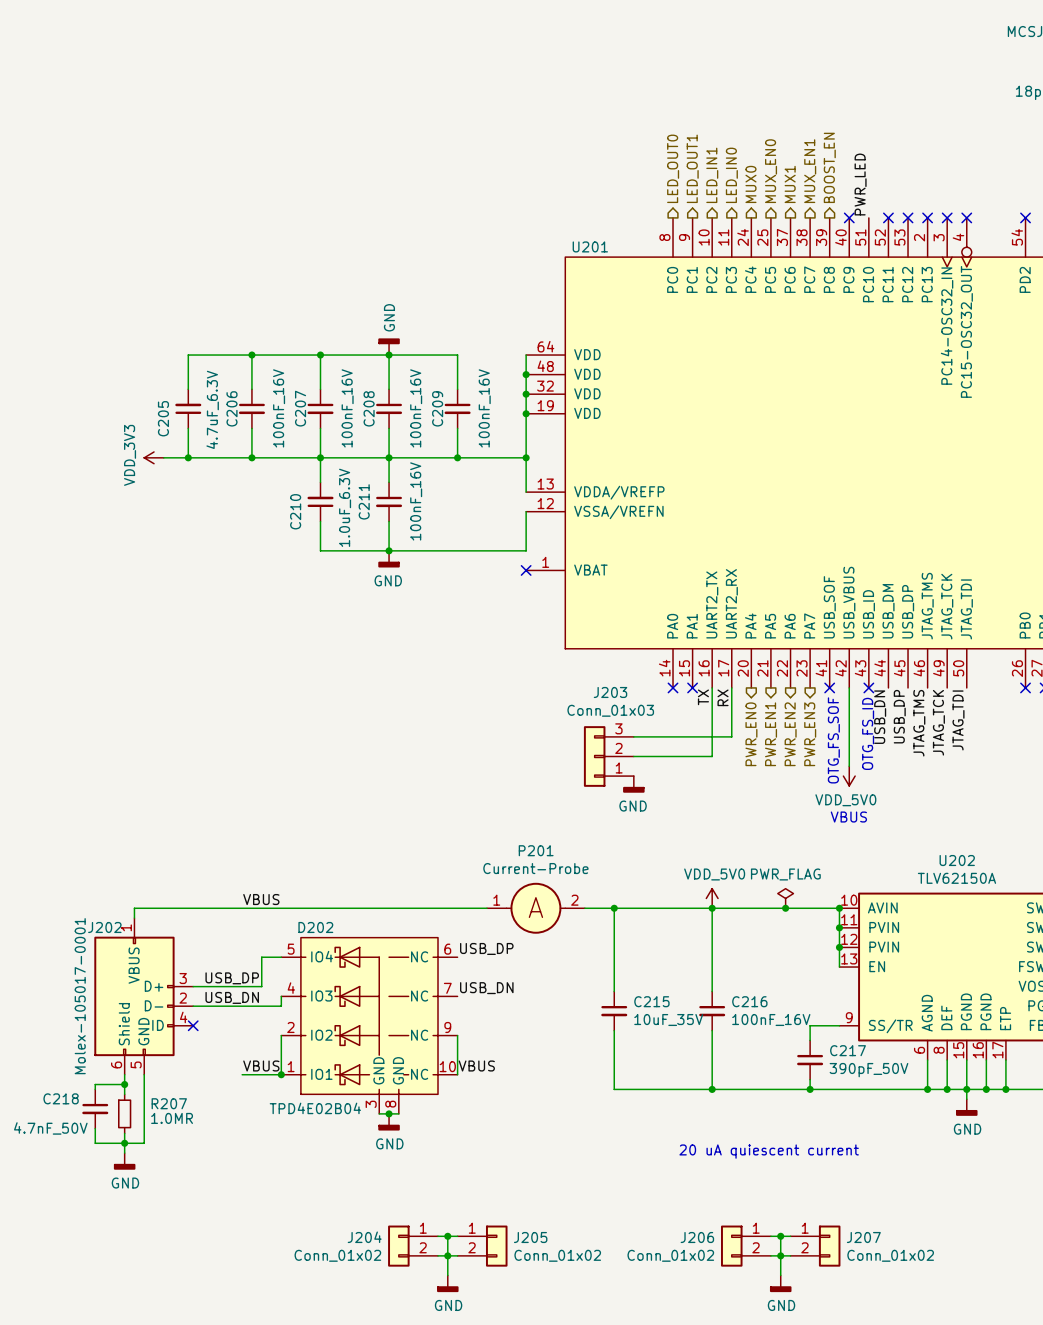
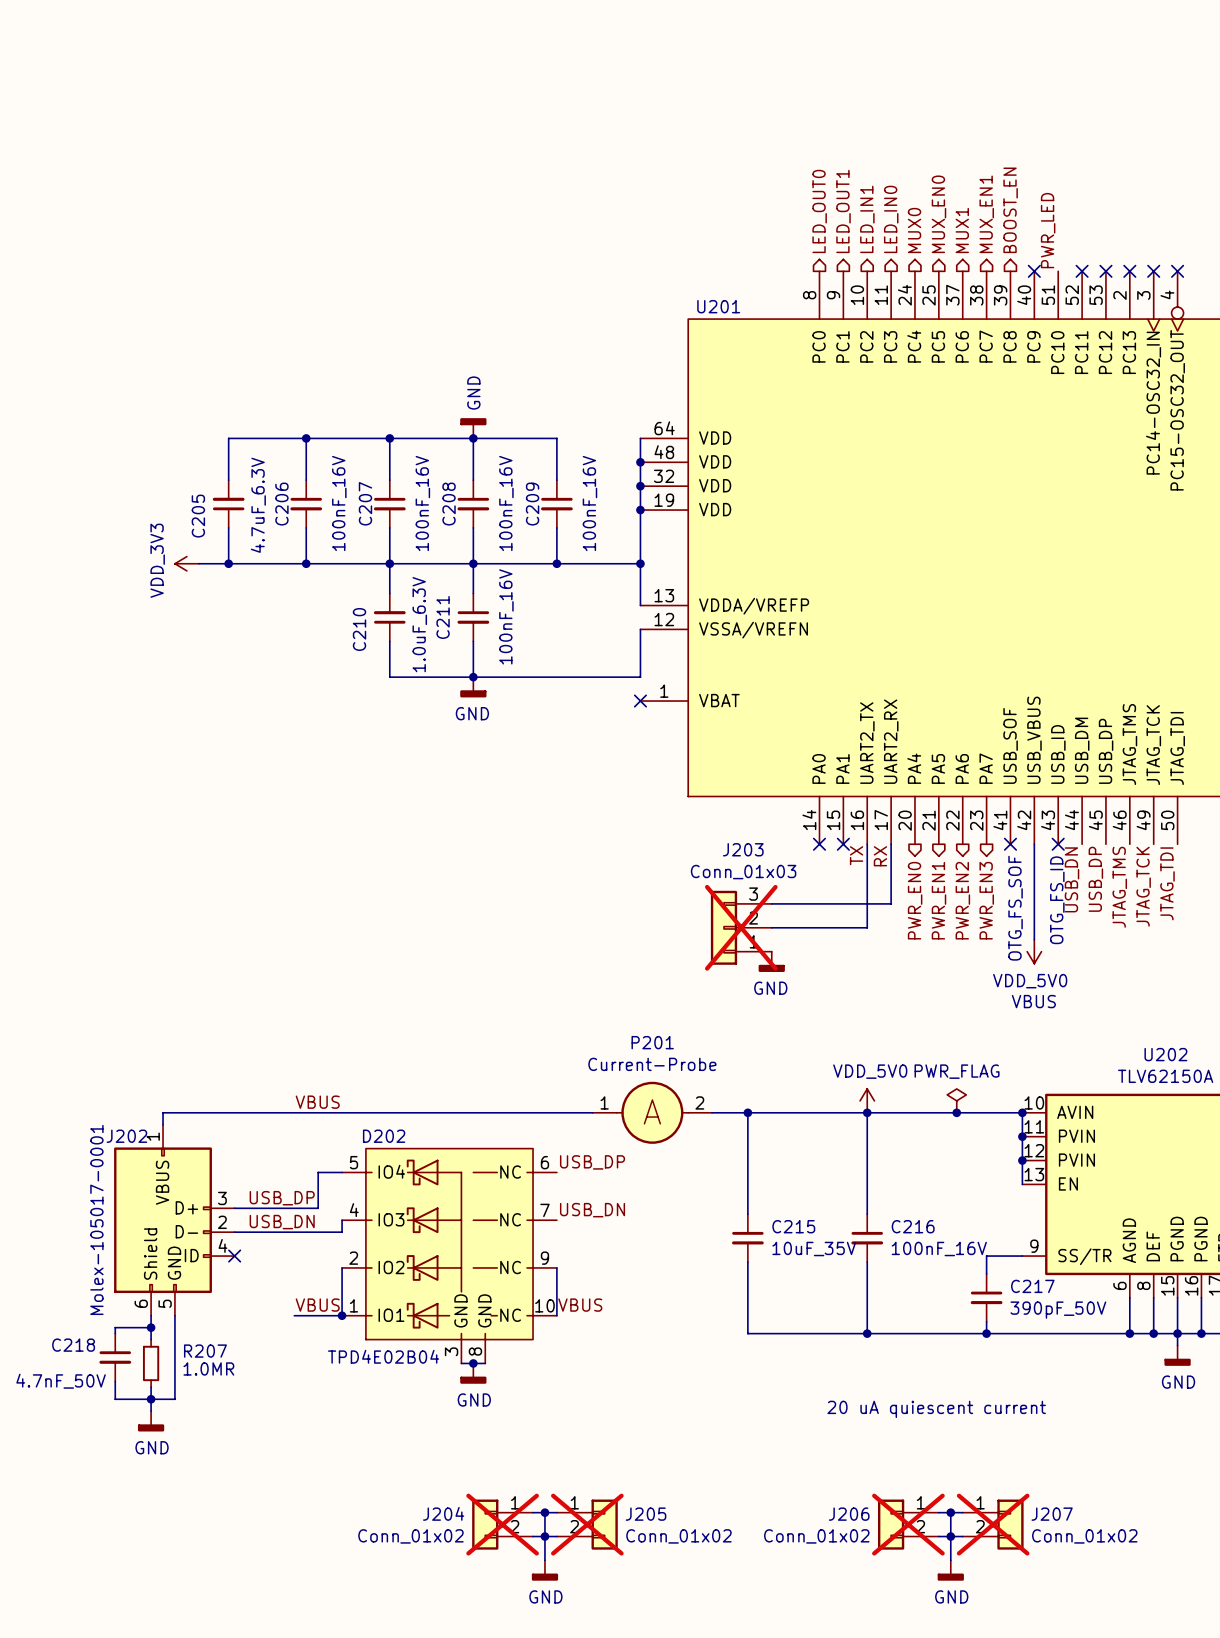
J203 do-not-place cross: none -> (741, 927)
J204 do-not-place cross: none -> (502, 1524)
J205 do-not-place cross: none -> (587, 1524)
J206 do-not-place cross: none -> (908, 1524)
J207 do-not-place cross: none -> (993, 1524)

